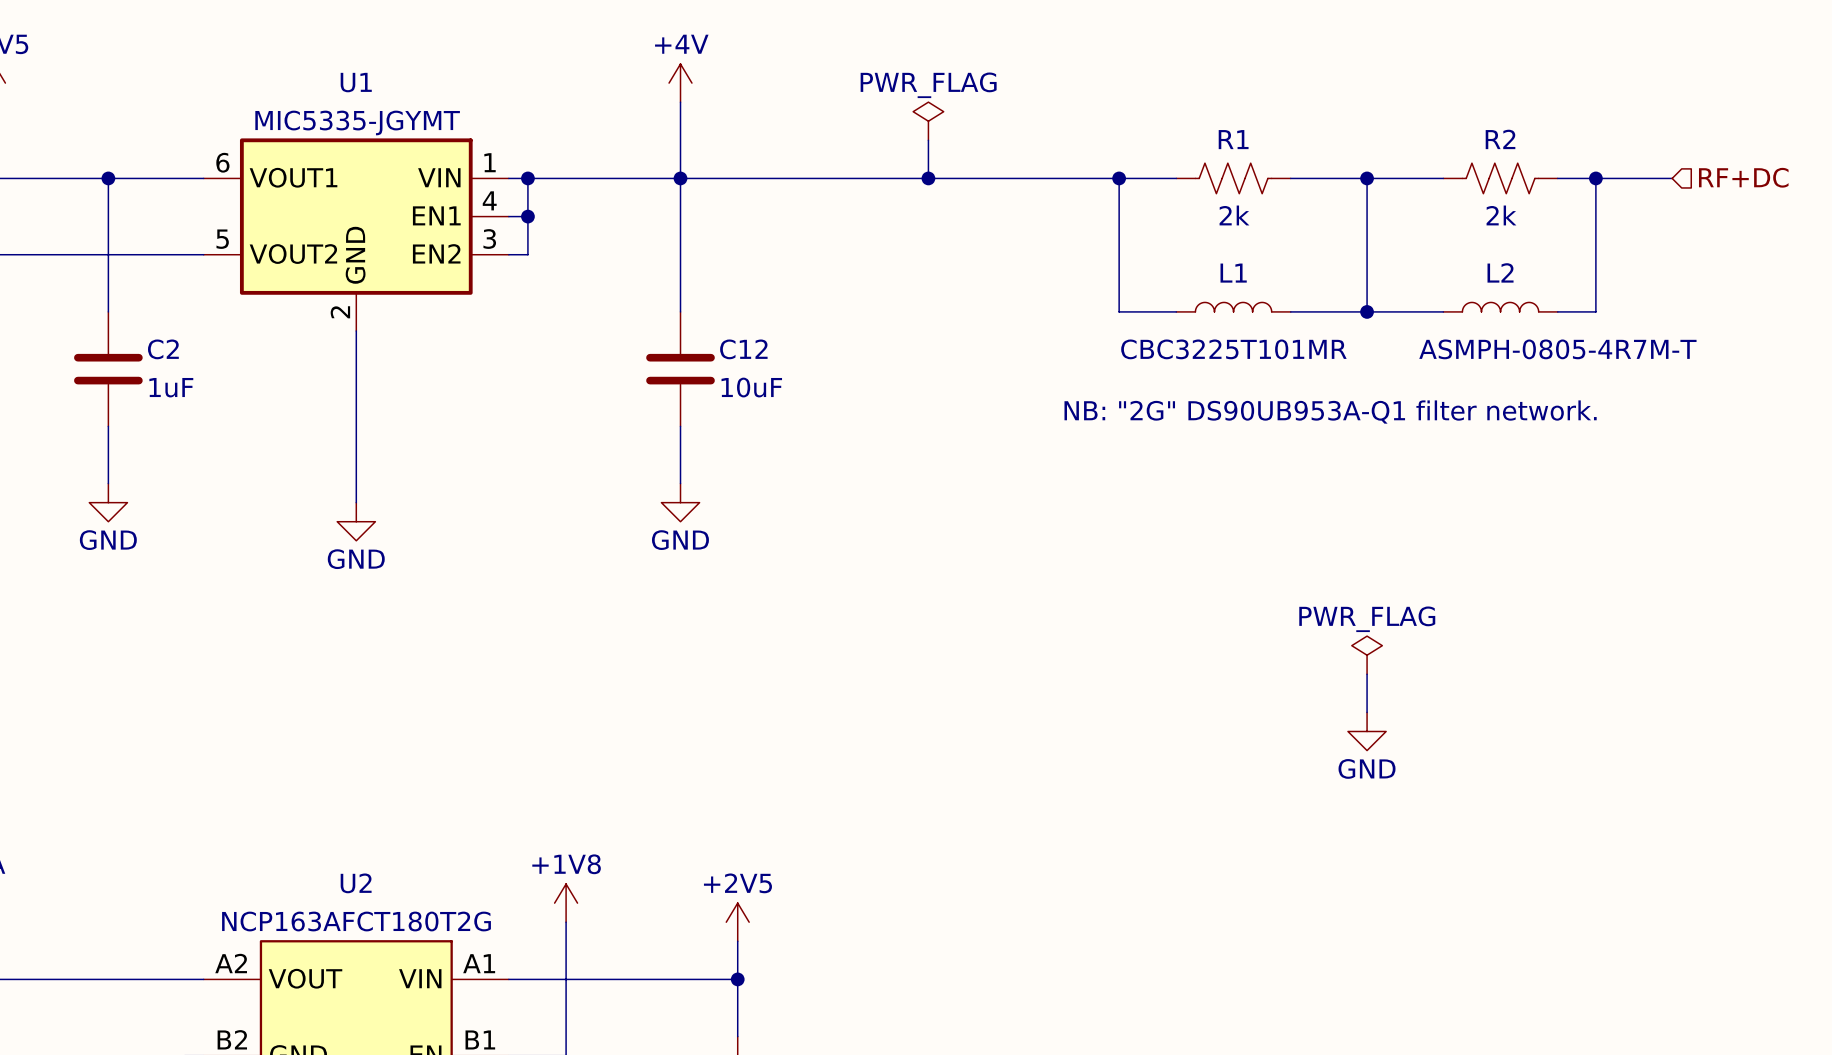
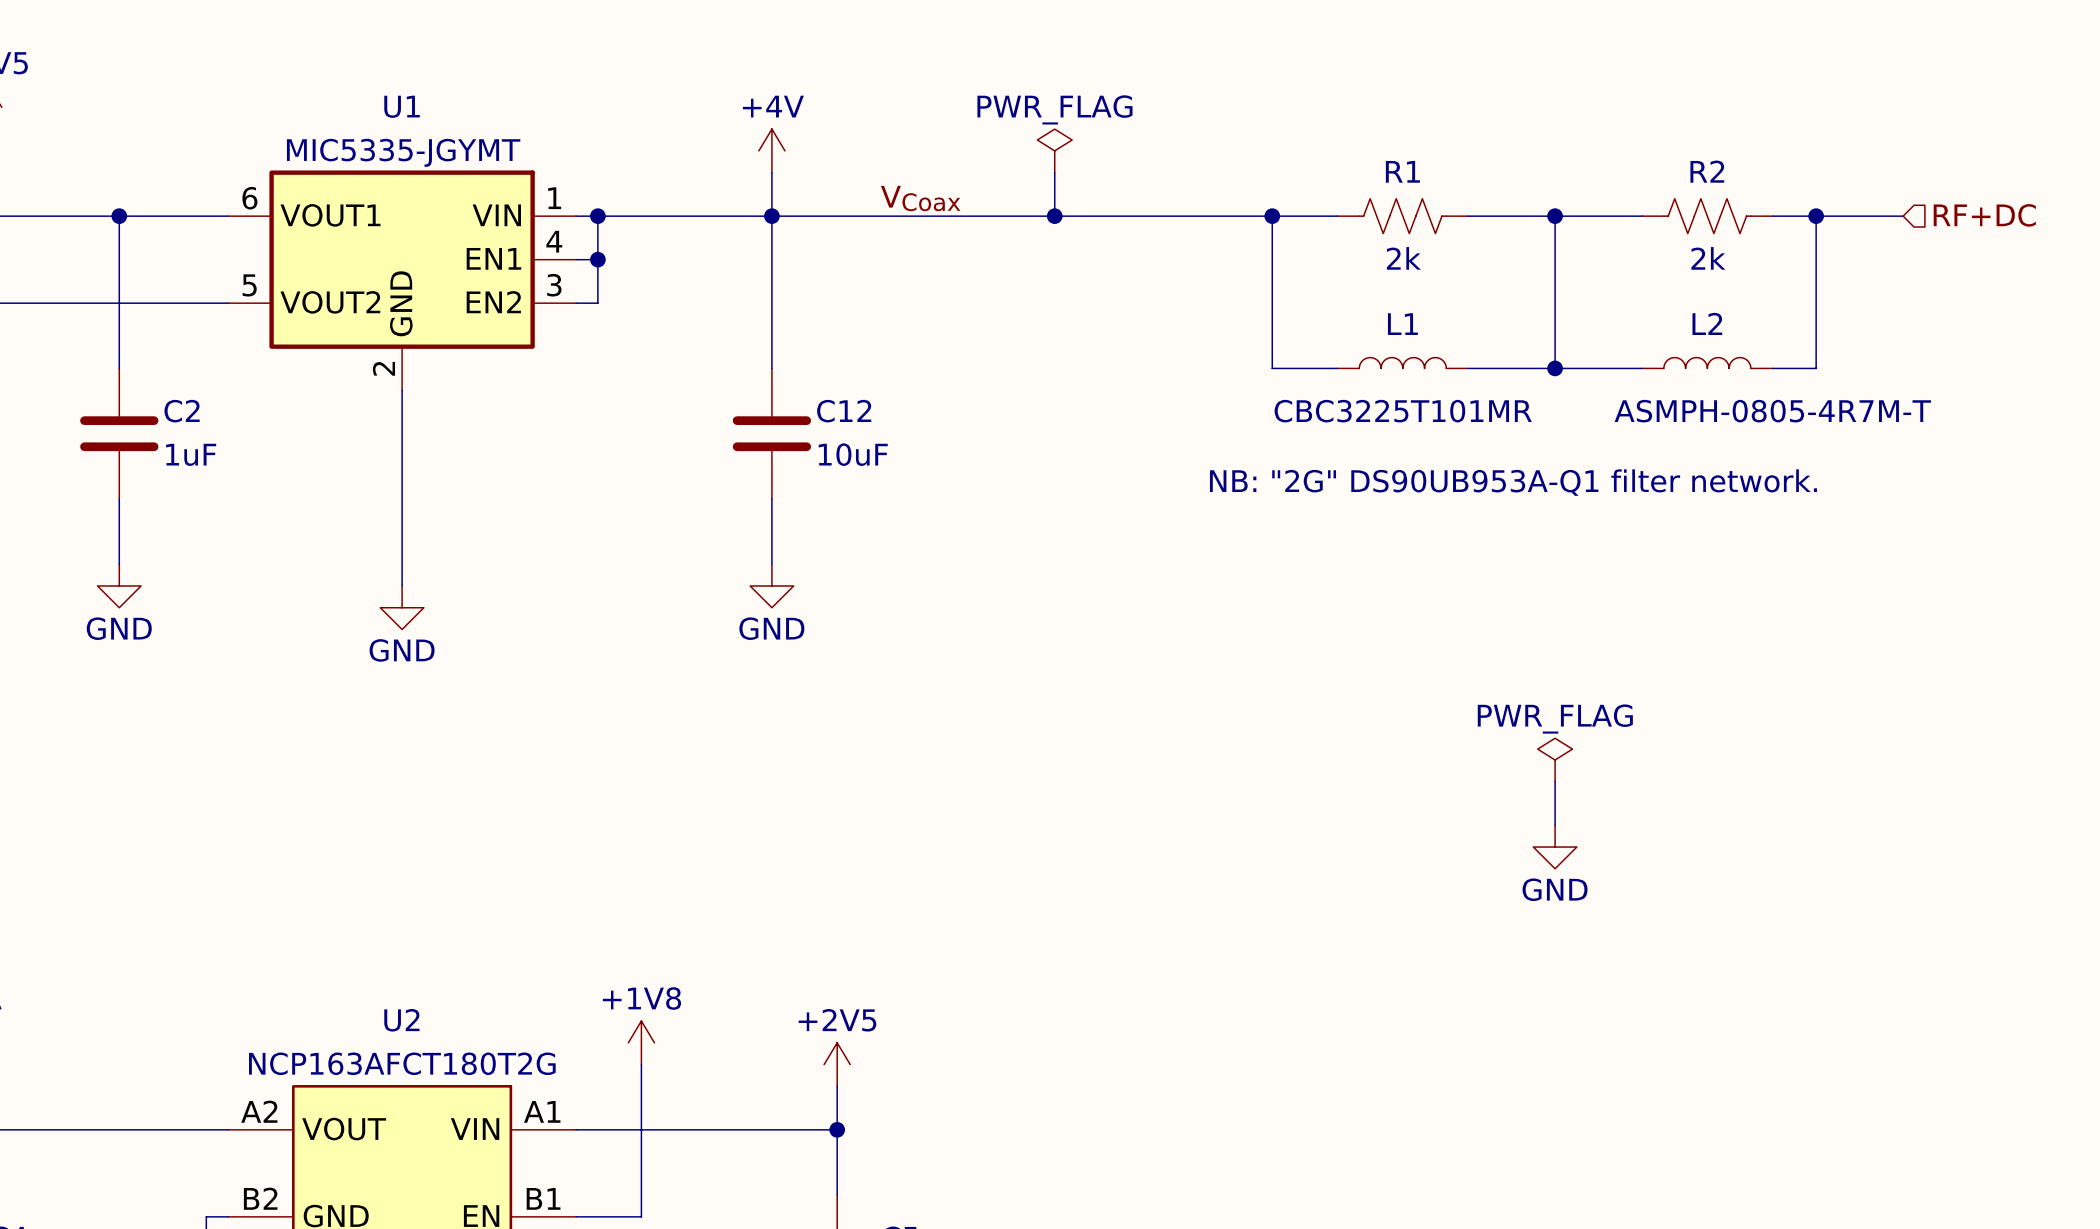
power symbol position: +4V (680, 83) -> +4V (771, 150)
label: none -> VCoax (920, 198)

